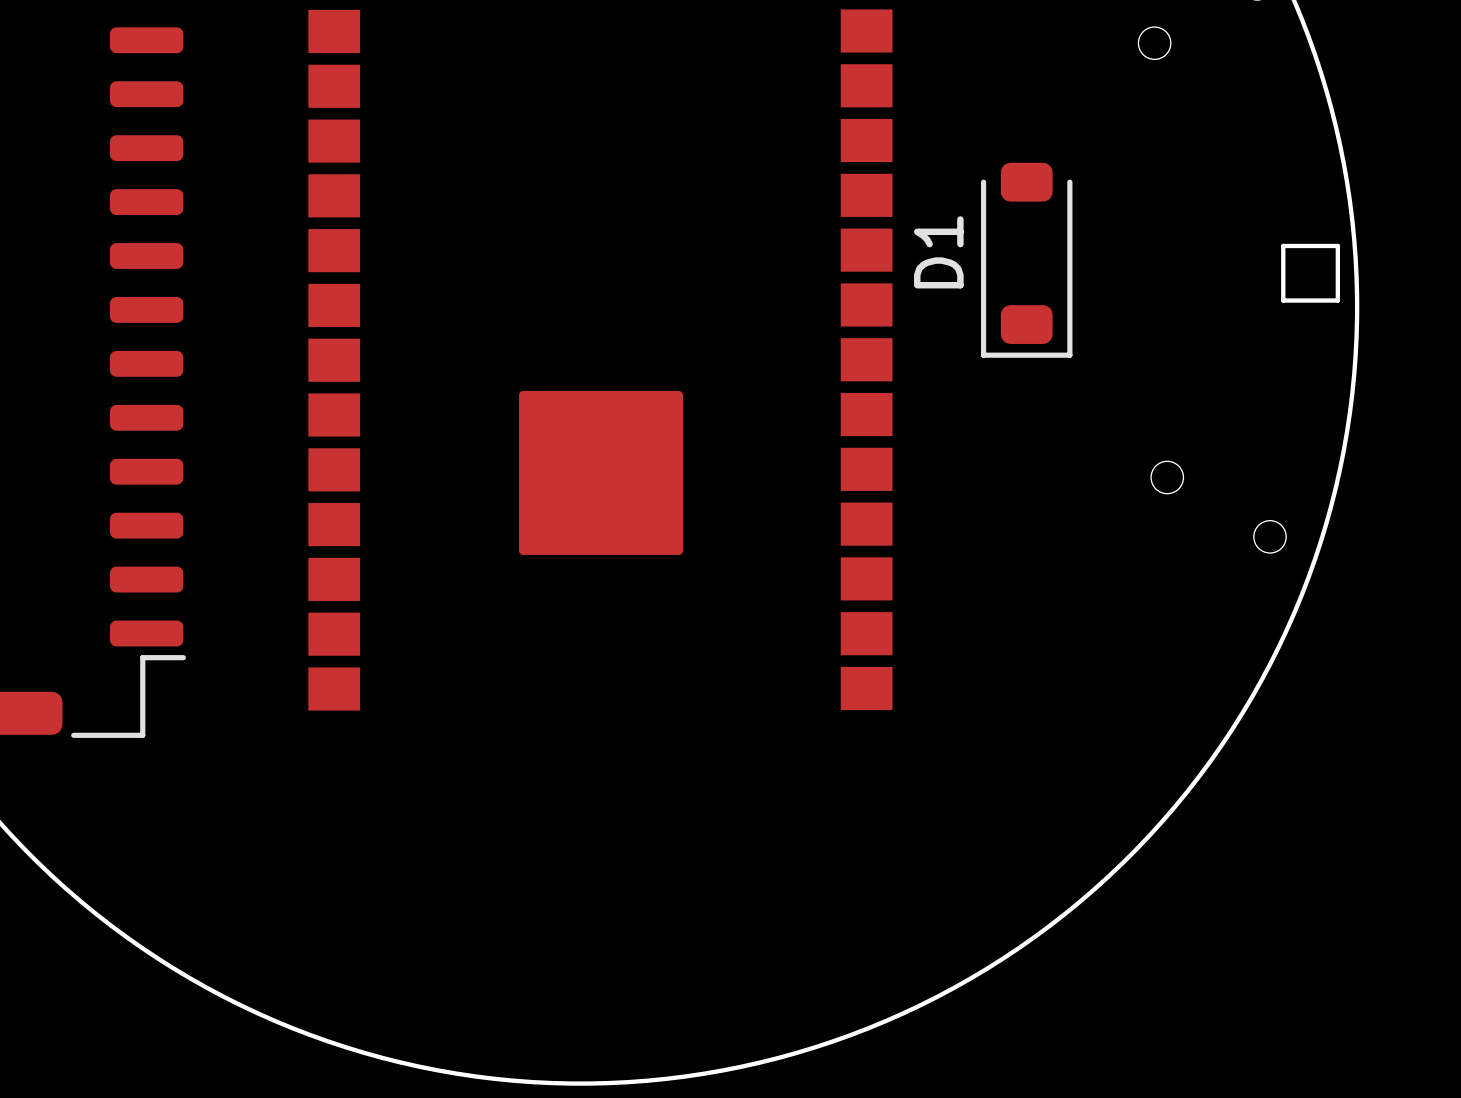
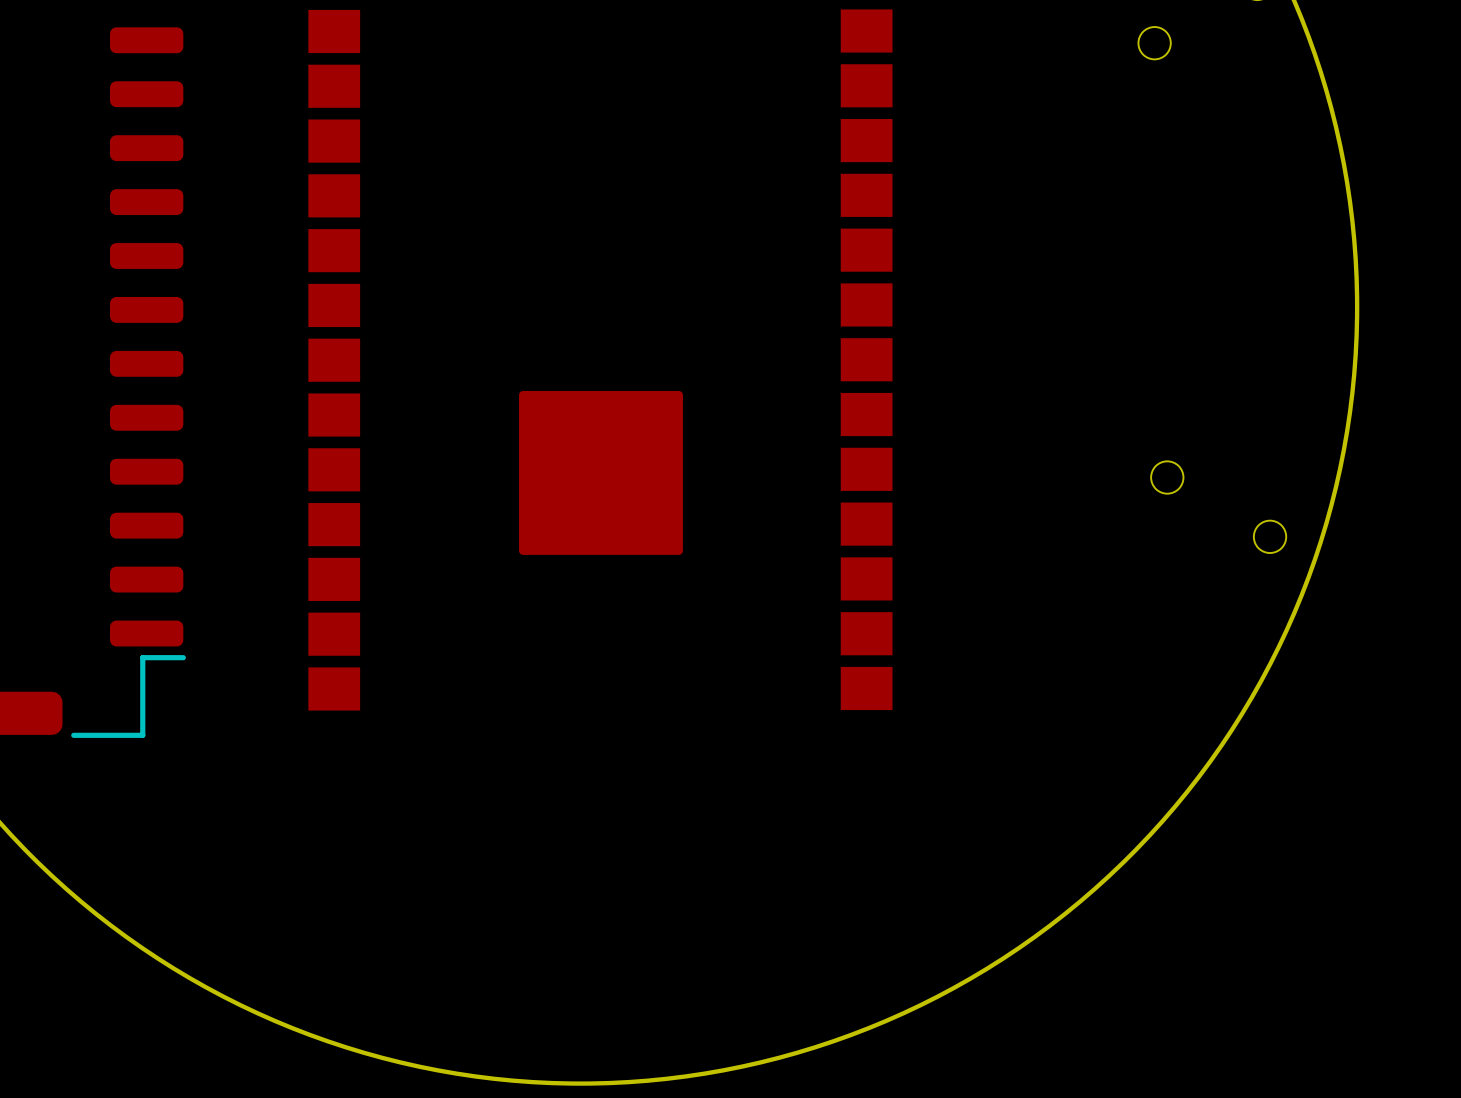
board edge: (1283, 245) (1337, 245) (1337, 300) (1283, 300) (1283, 245) -> none
D1: (1026, 260) -> none

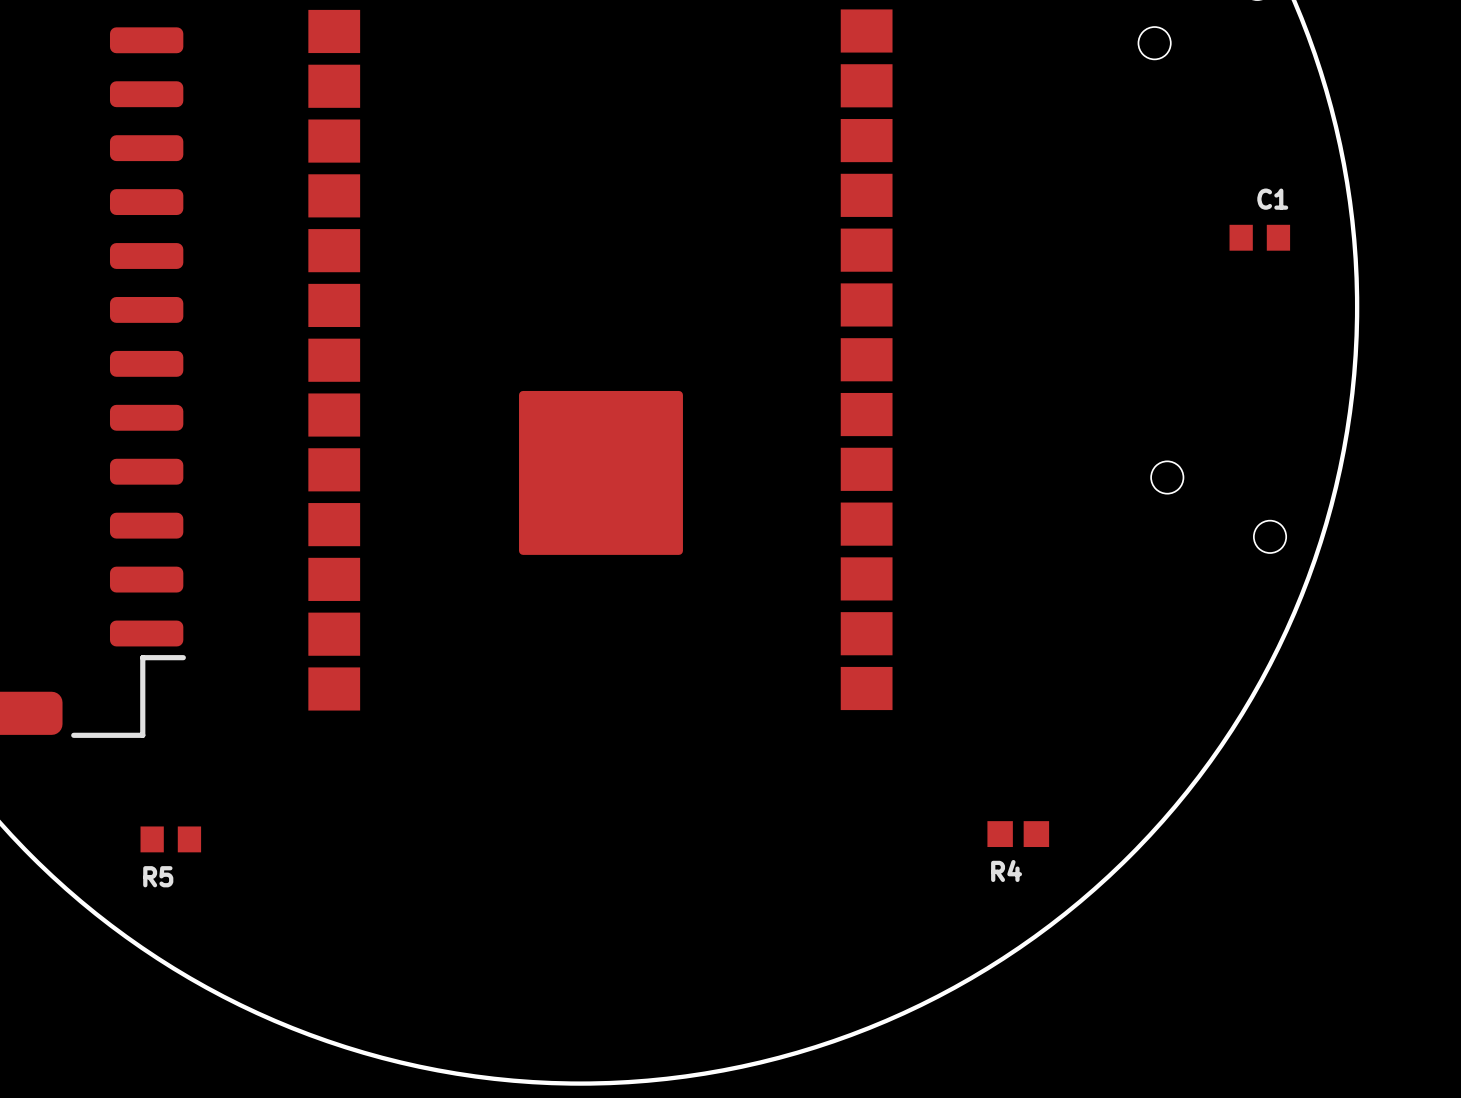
C1: none -> (1259, 237)
R4: none -> (1018, 834)
R5: none -> (170, 839)

